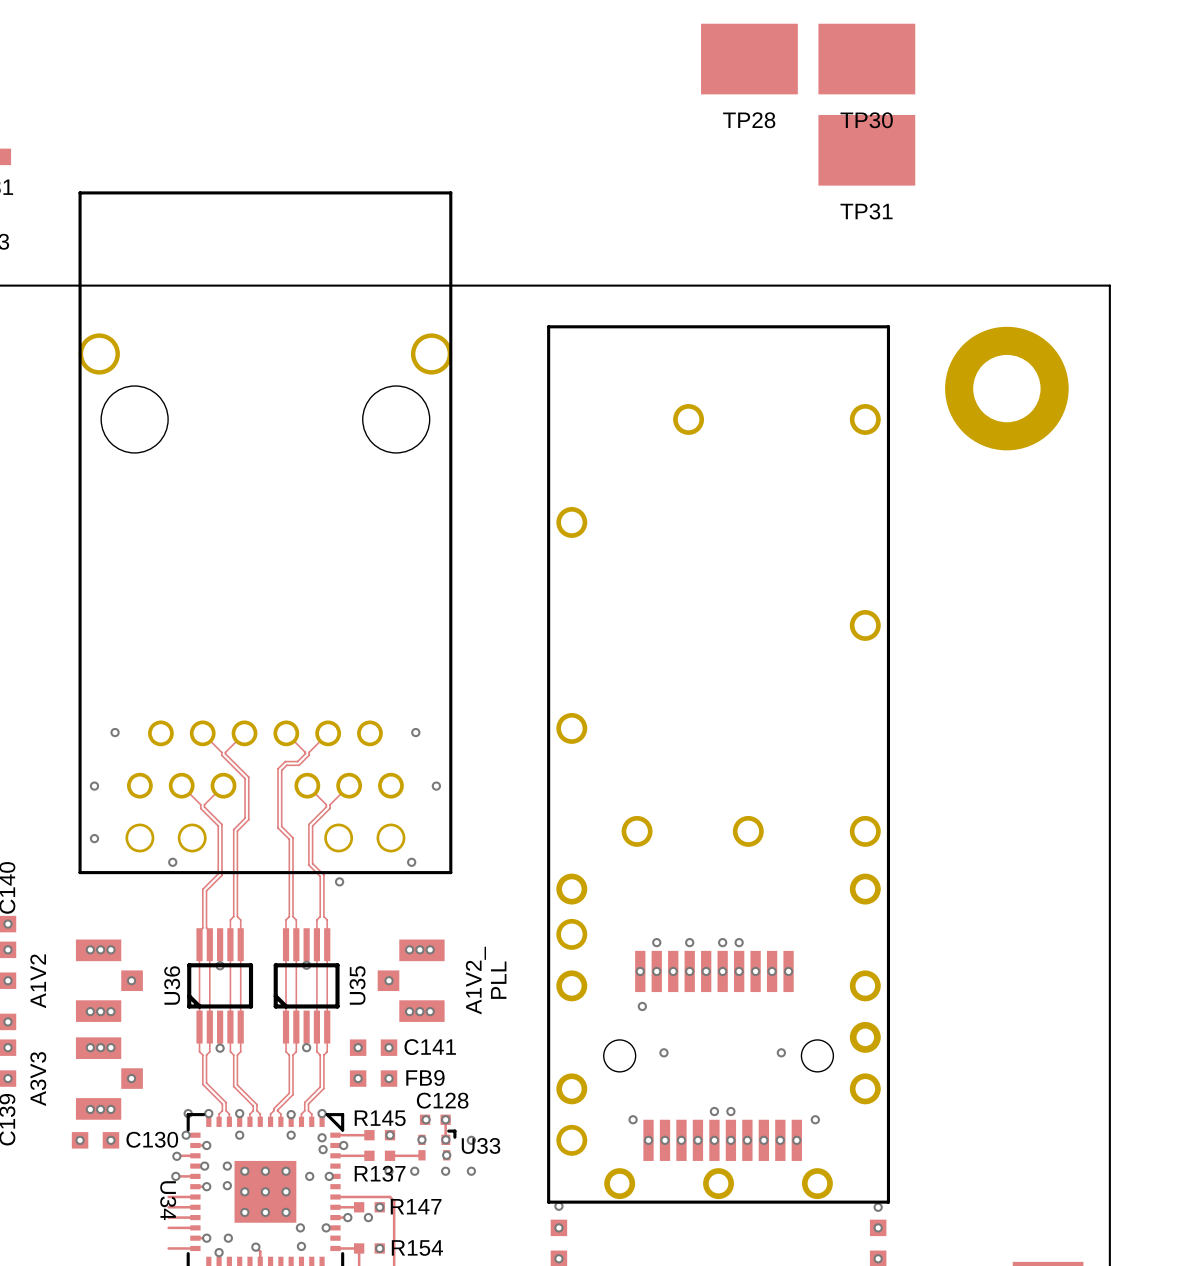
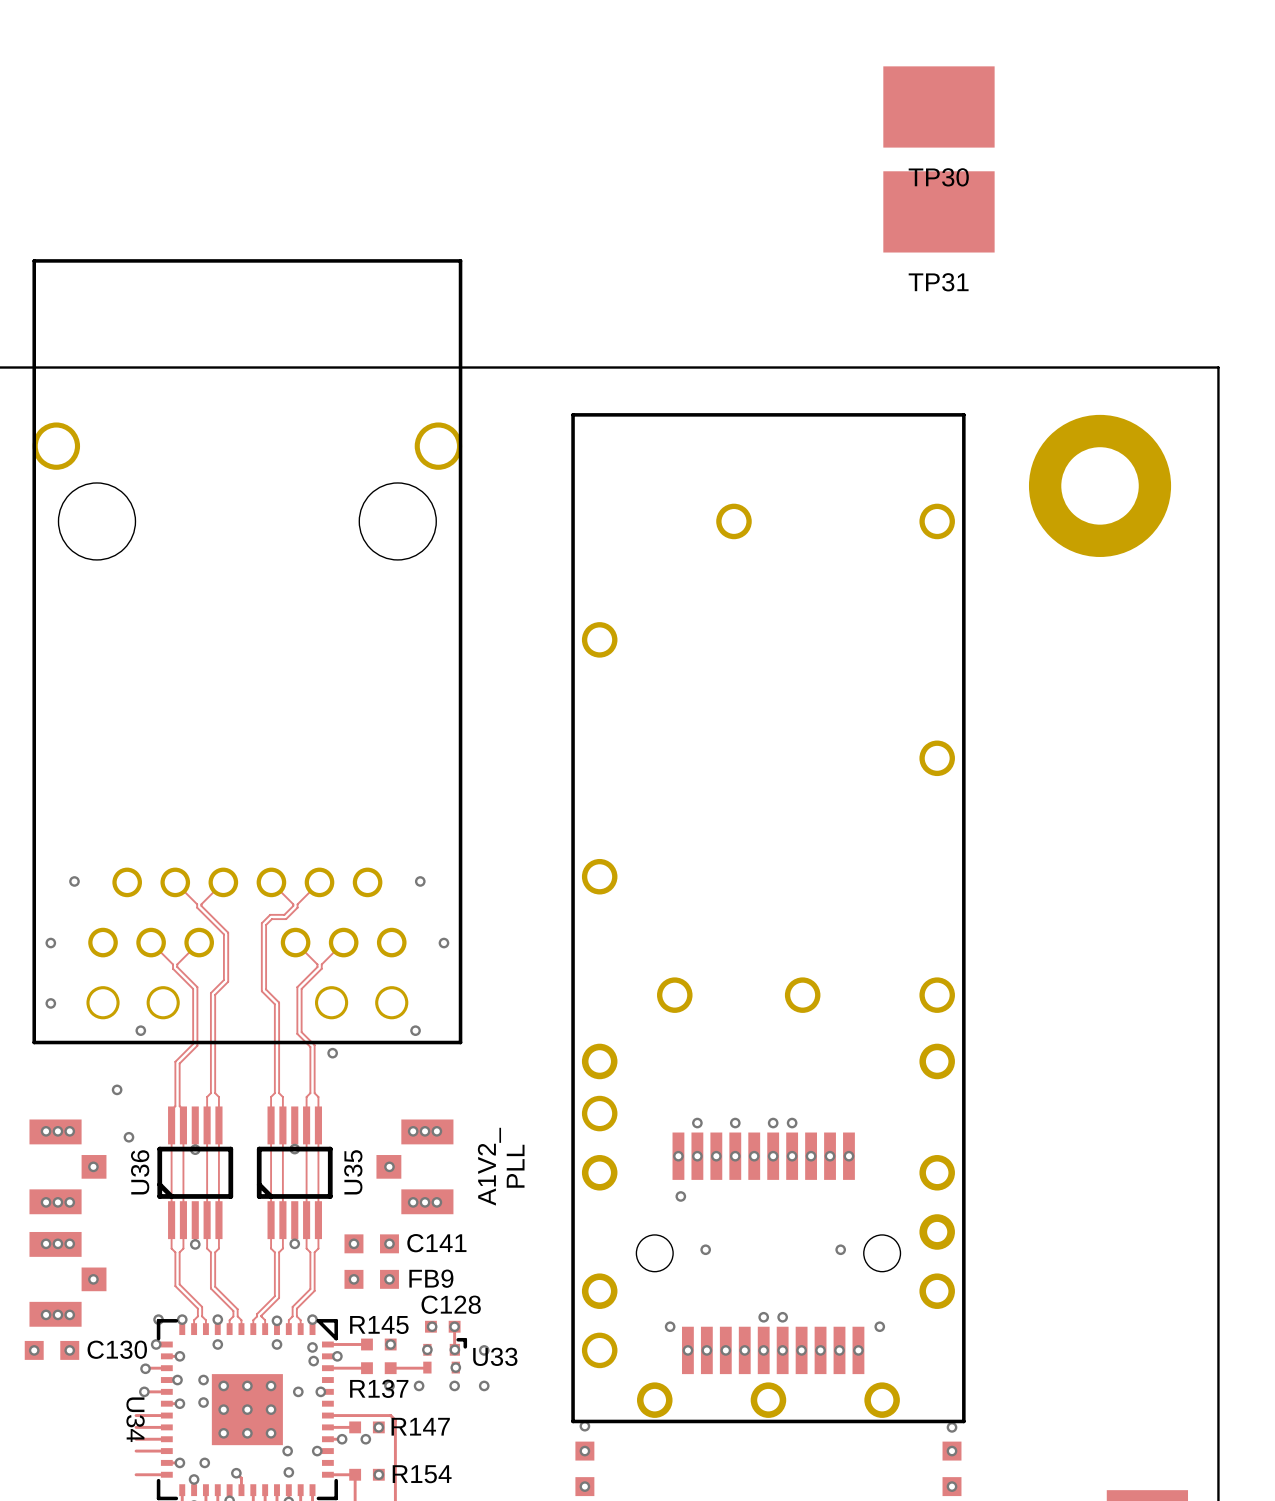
TP28: (749, 59) -> none
via: none -> (117, 1089)
via: none -> (128, 1137)

